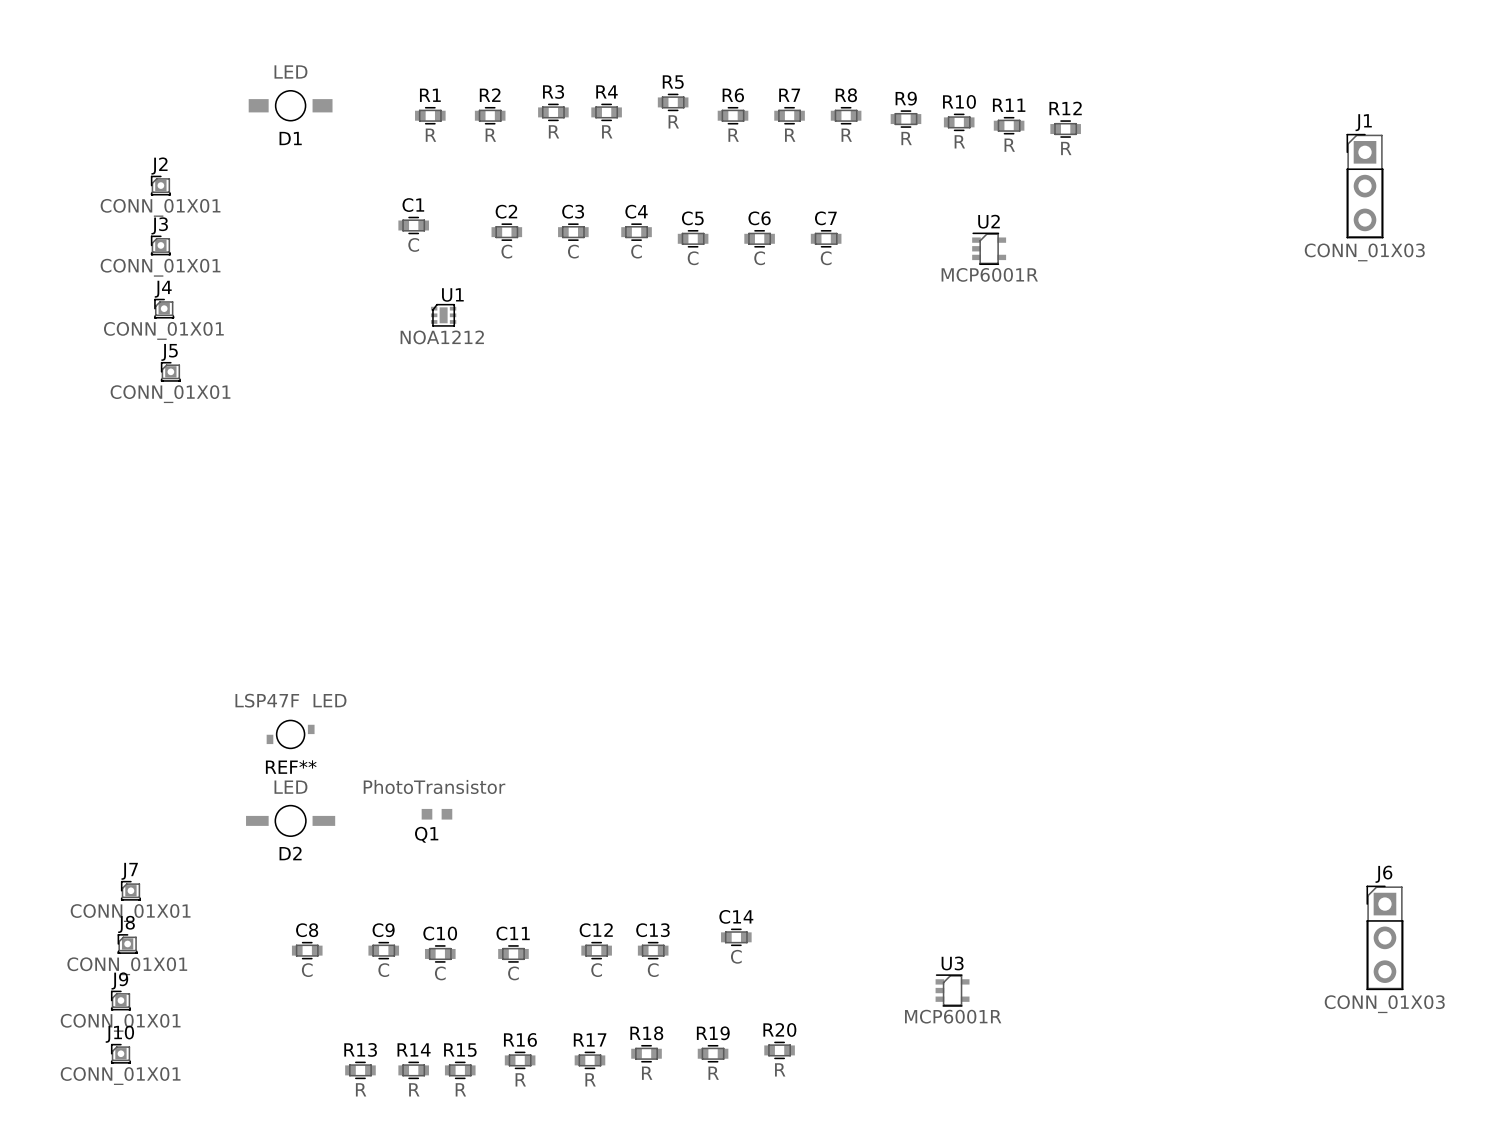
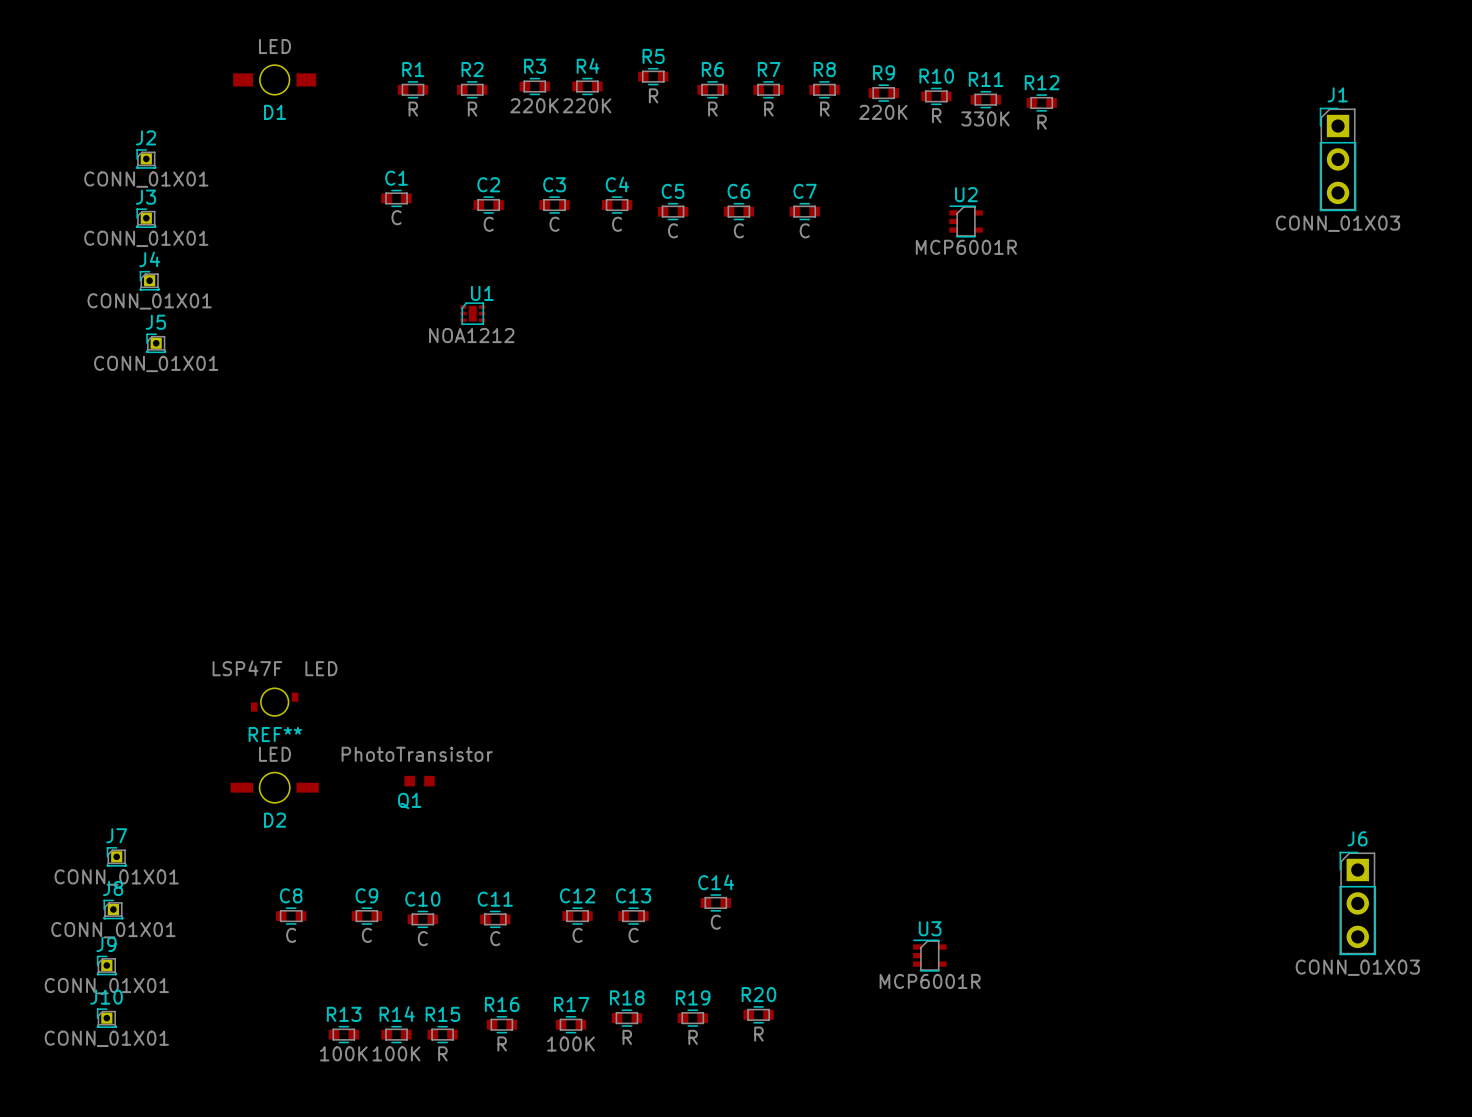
R3 value: R (554, 131) -> 220K (534, 105)
R4 value: R (607, 131) -> 220K (587, 105)
R9 value: R (906, 138) -> 220K (883, 112)
R11 value: R (1009, 145) -> 330K (985, 118)
U1 position: (443, 315) -> (472, 313)
R17 value: R (590, 1079) -> 100K (570, 1043)
R13 value: R (361, 1089) -> 100K (343, 1053)
R14 value: R (414, 1089) -> 100K (396, 1053)

